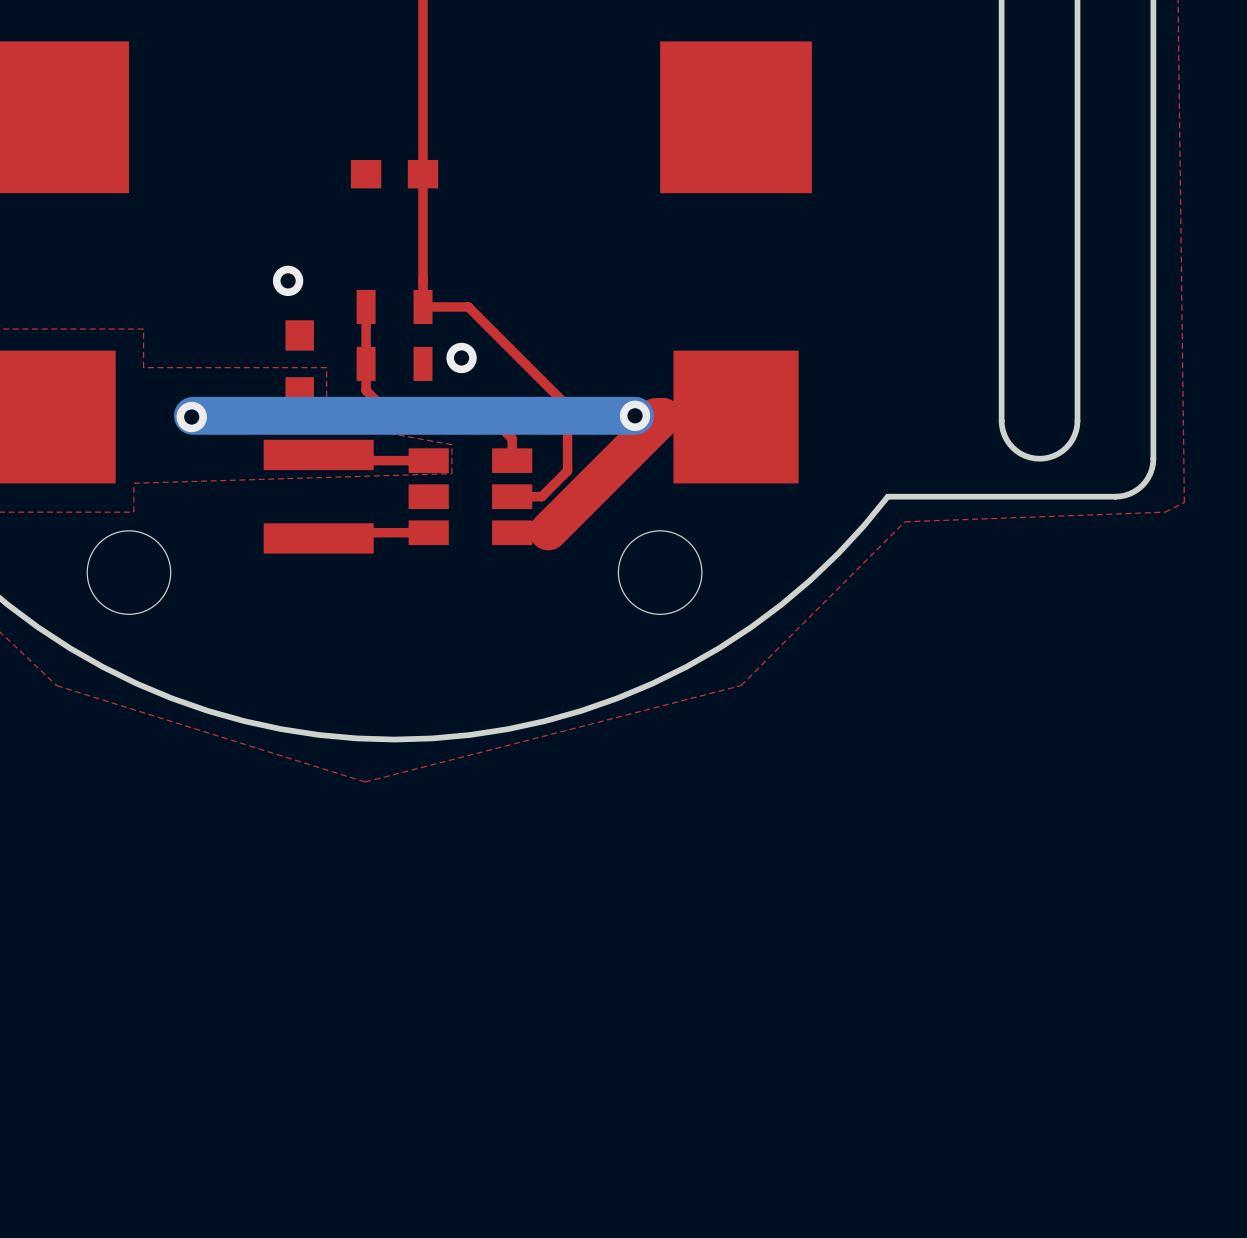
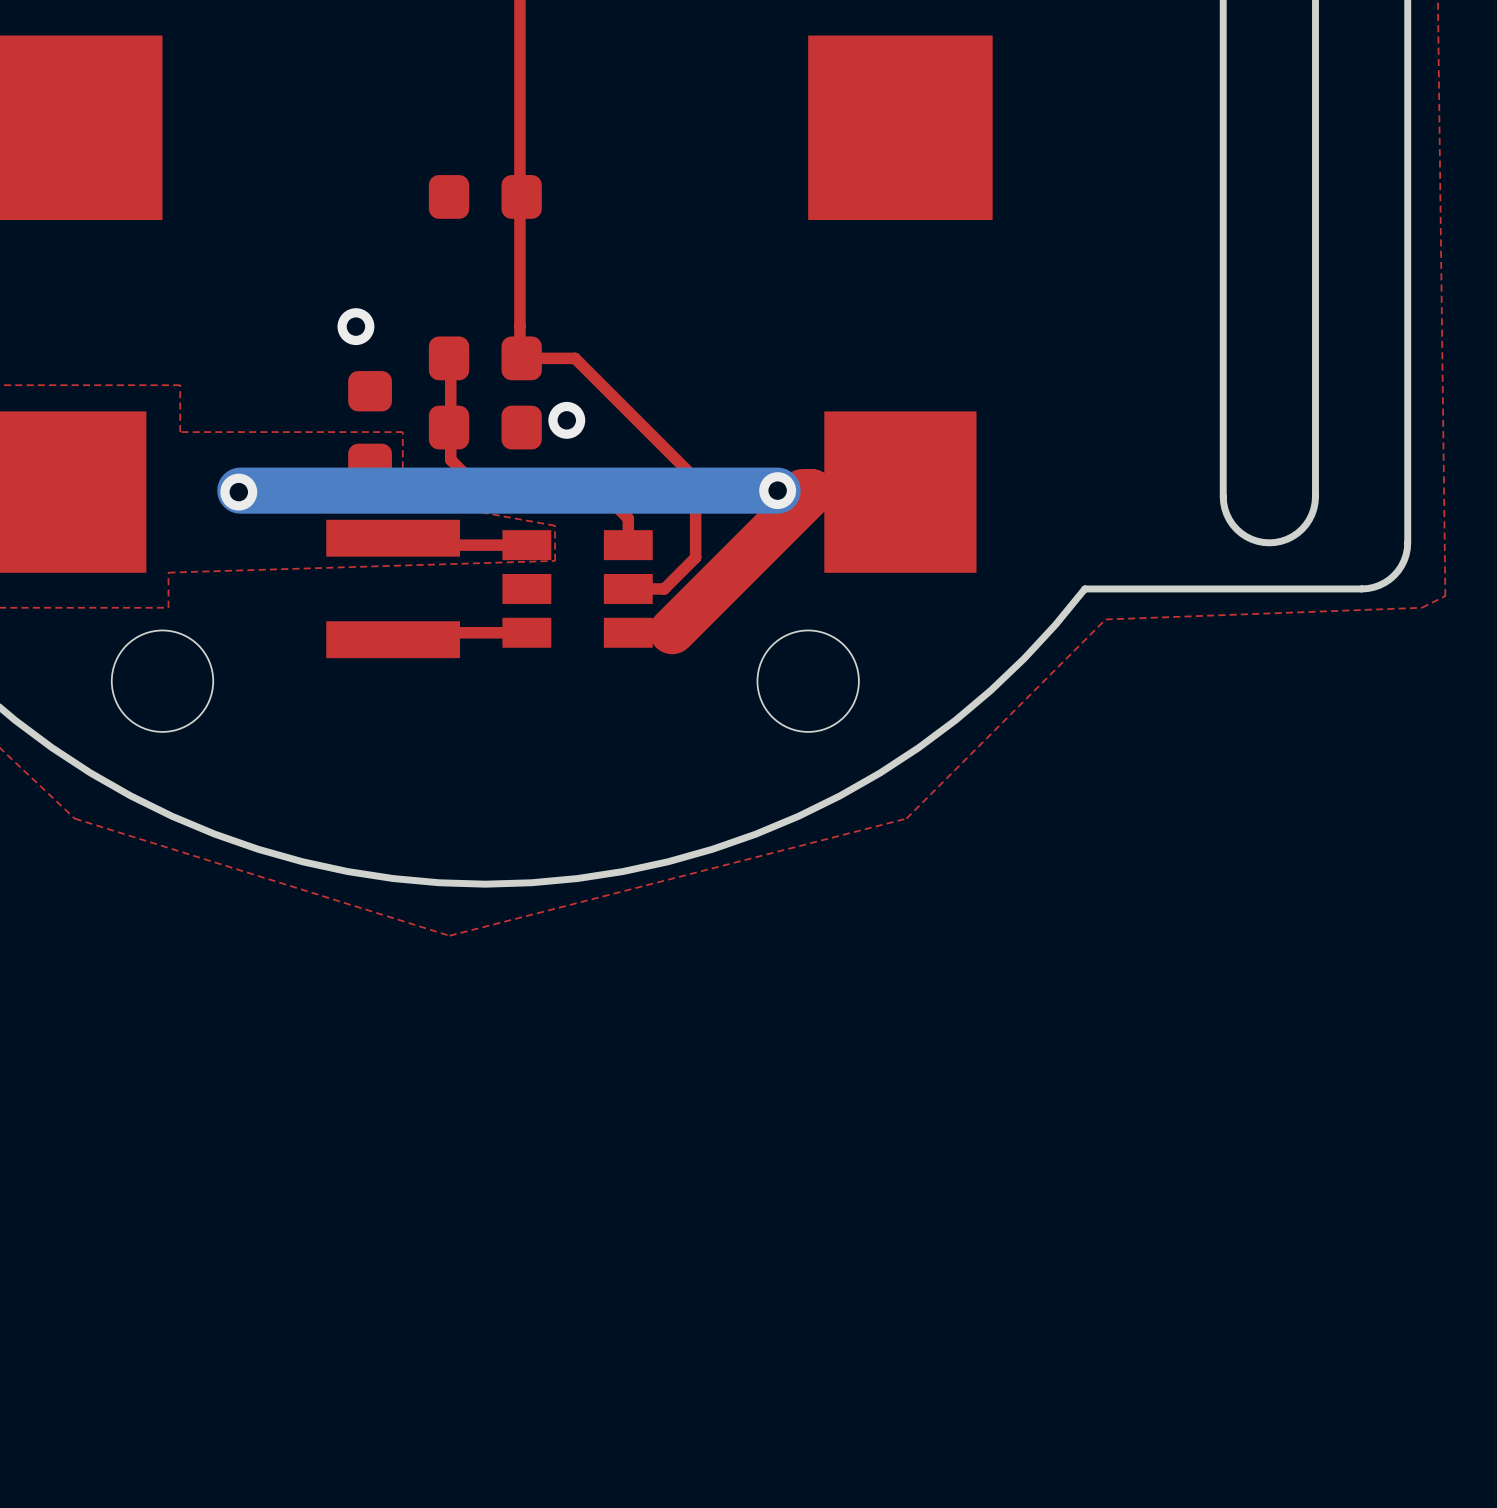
part footprint: [350, 159, 439, 189] -> [428, 175, 542, 219]
part footprint: [356, 289, 433, 325] -> [428, 336, 542, 381]
part footprint: [285, 320, 314, 408] -> [348, 371, 392, 485]
part footprint: [356, 346, 433, 381] -> [428, 405, 542, 450]

